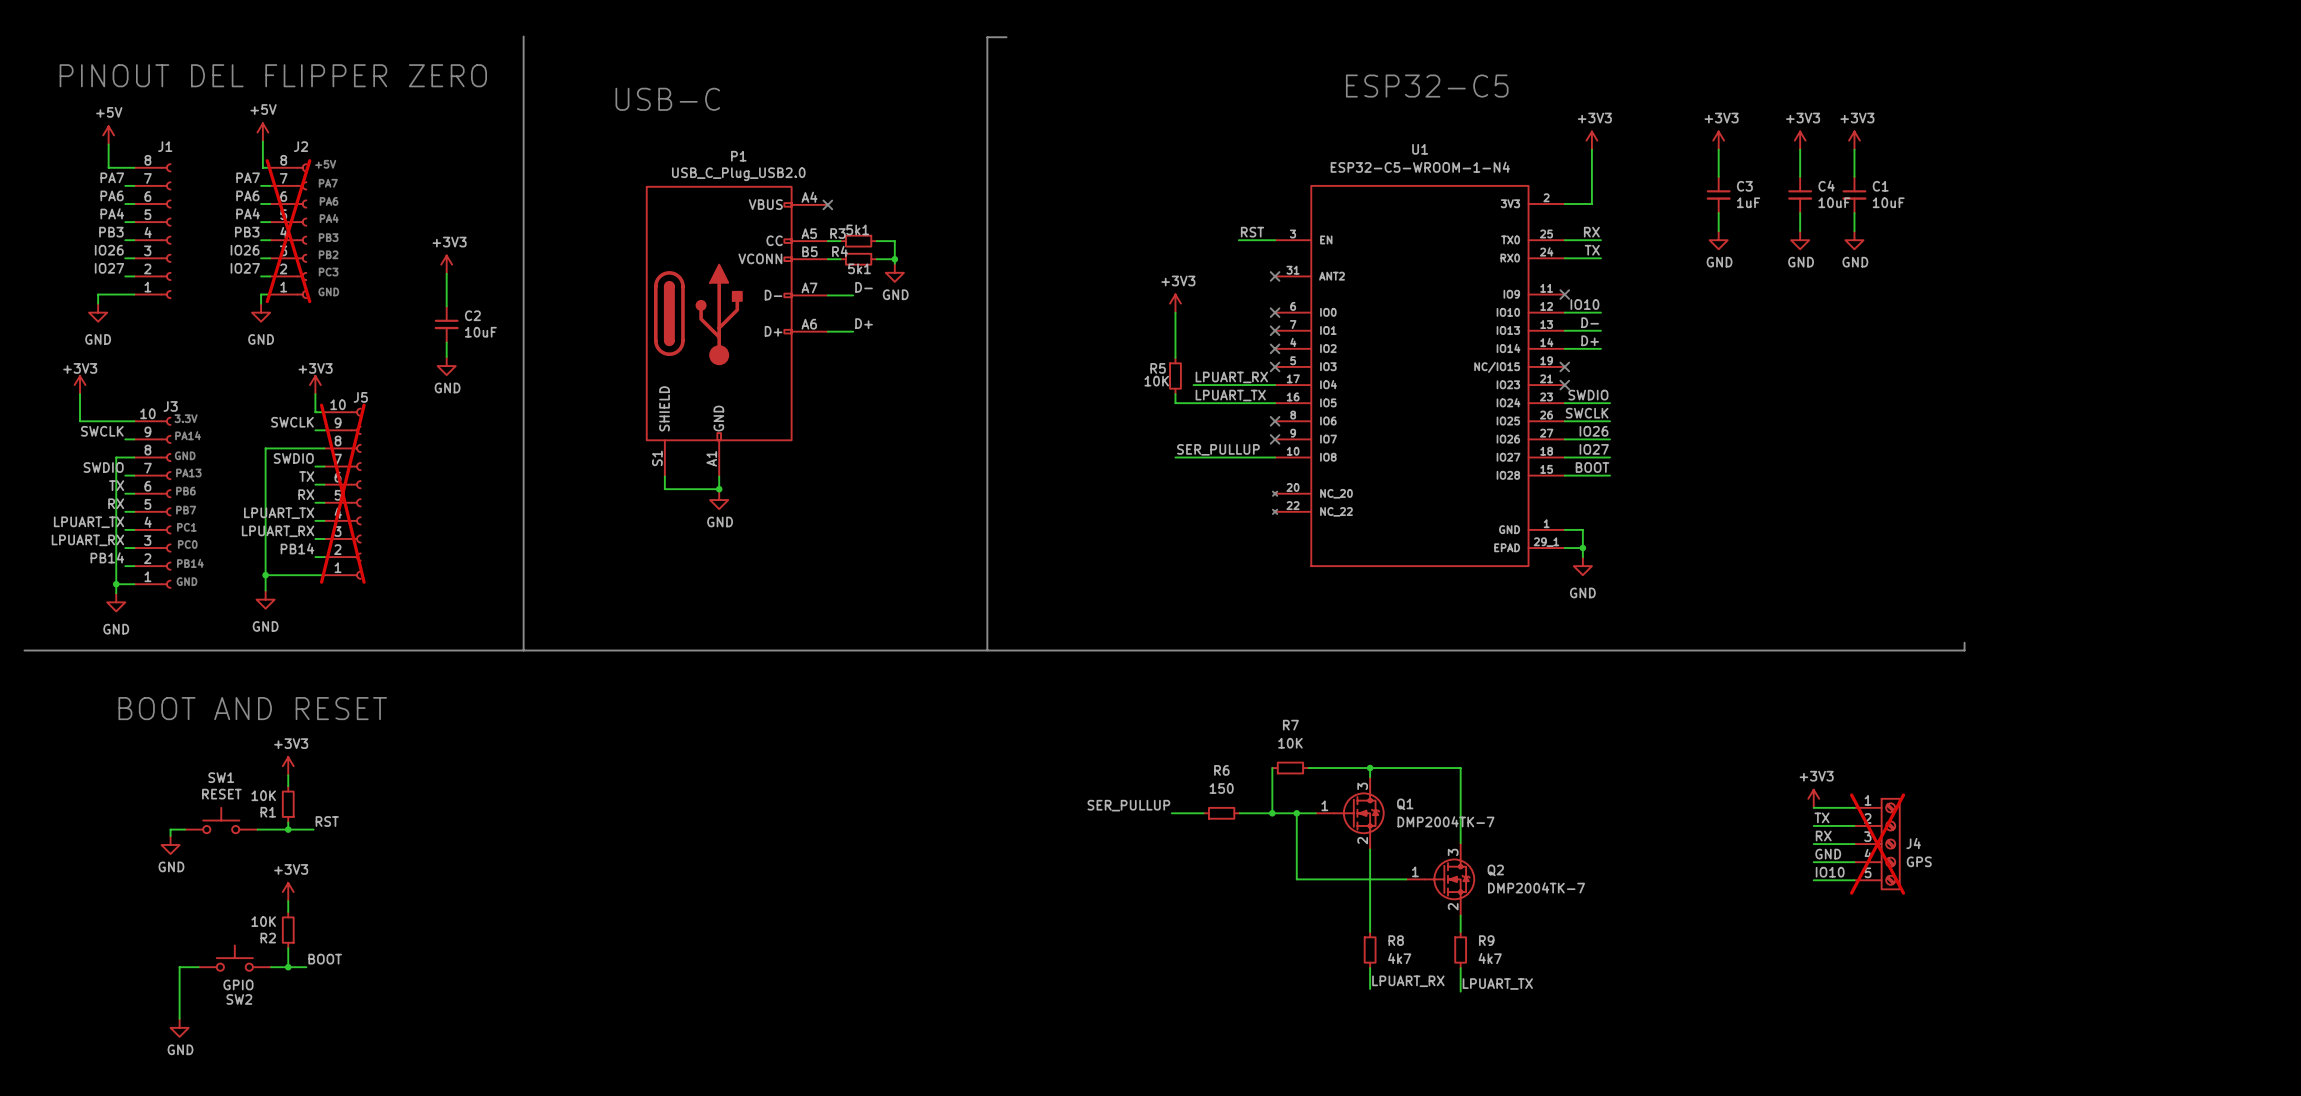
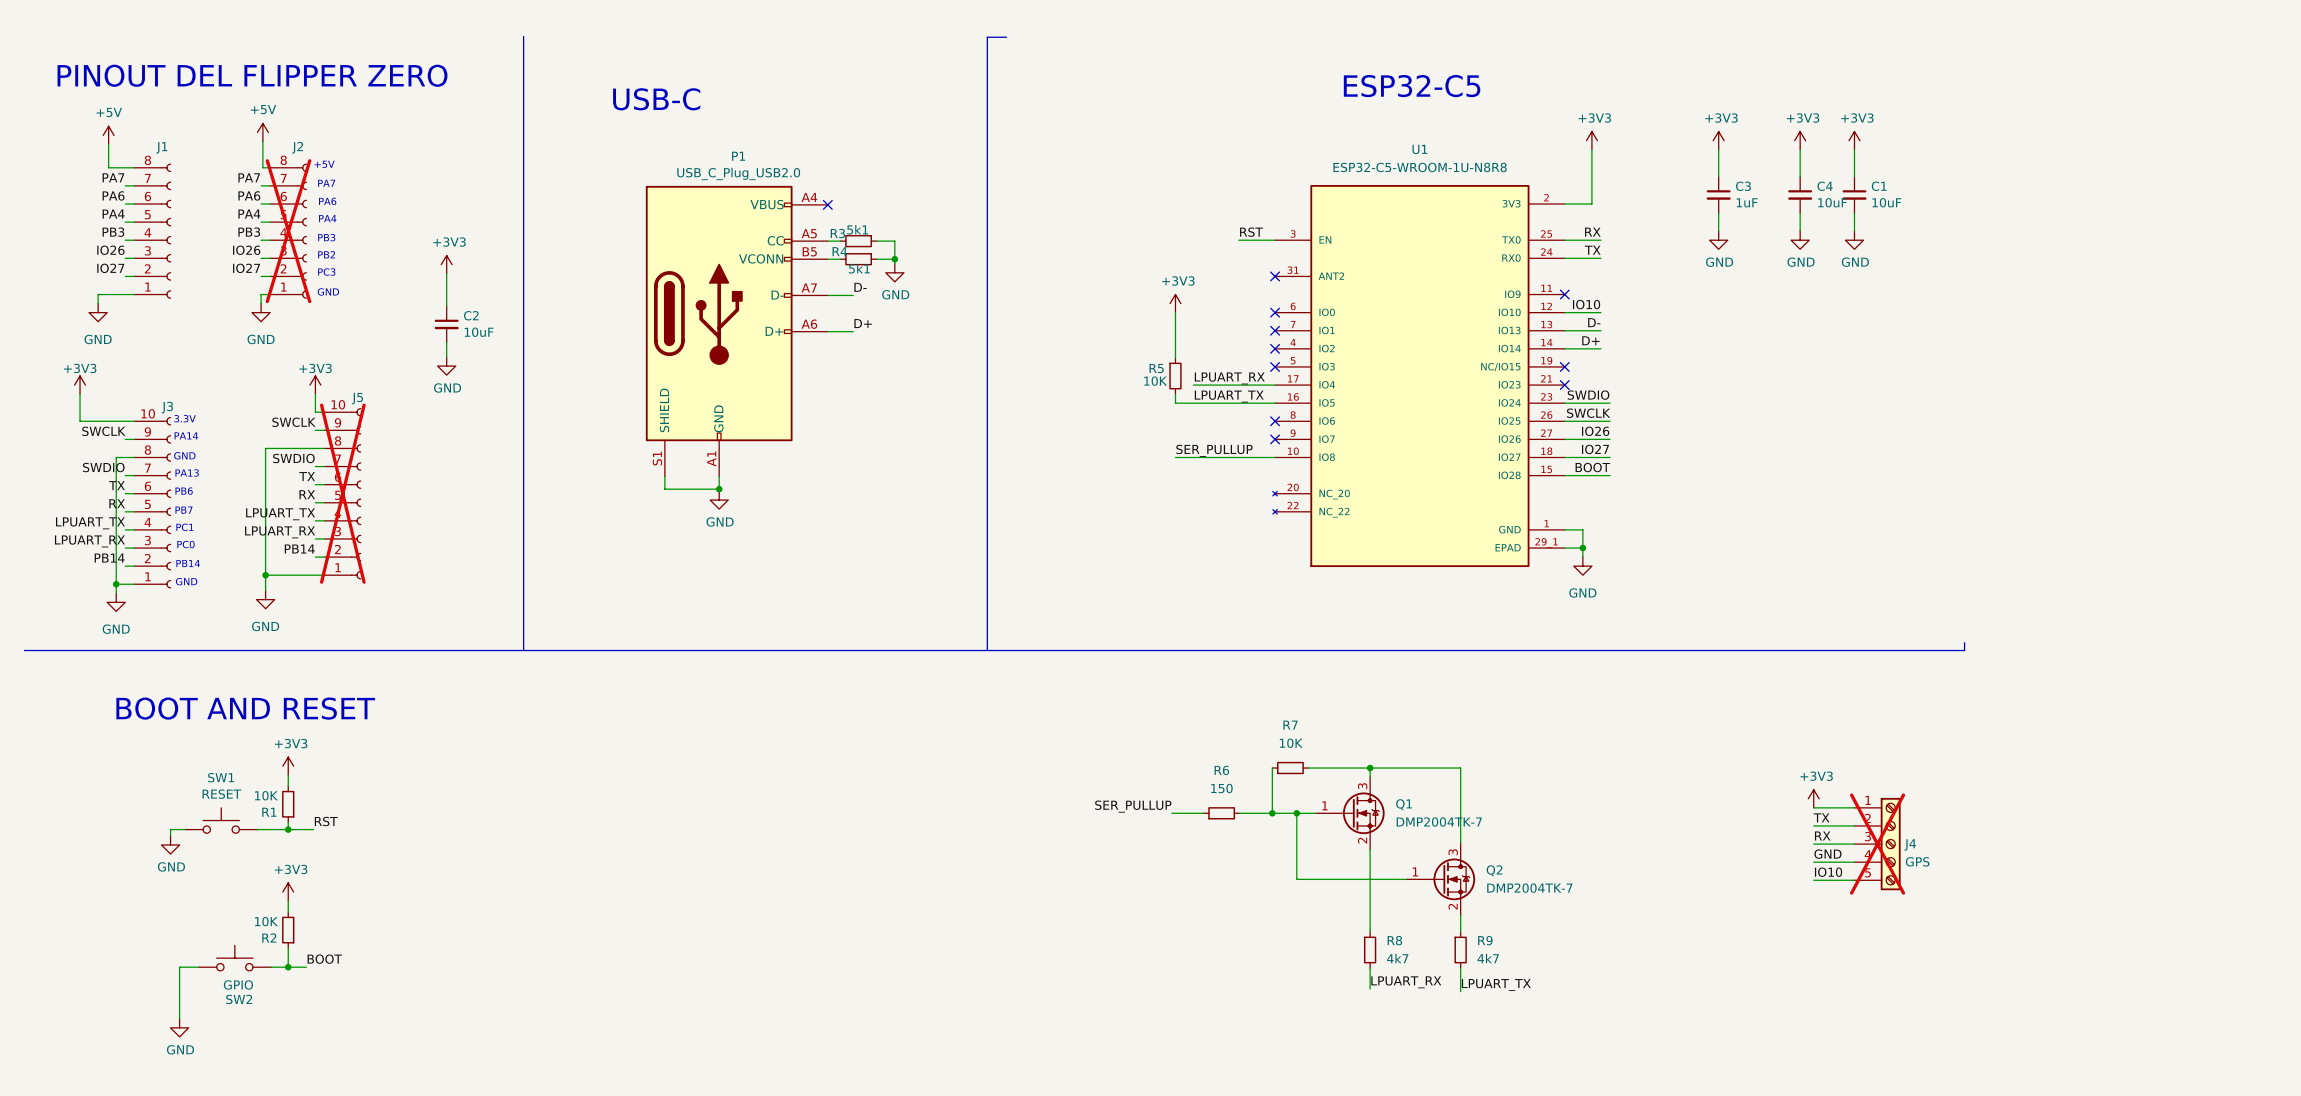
U1 value: ESP32-C5-WROOM-1-N4 (1420, 167) -> ESP32-C5-WROOM-1U-N8R8 (1420, 167)

